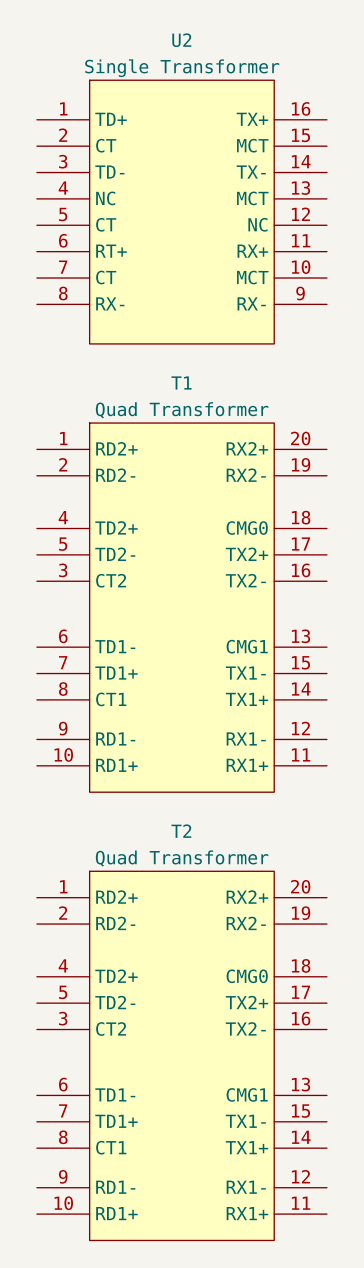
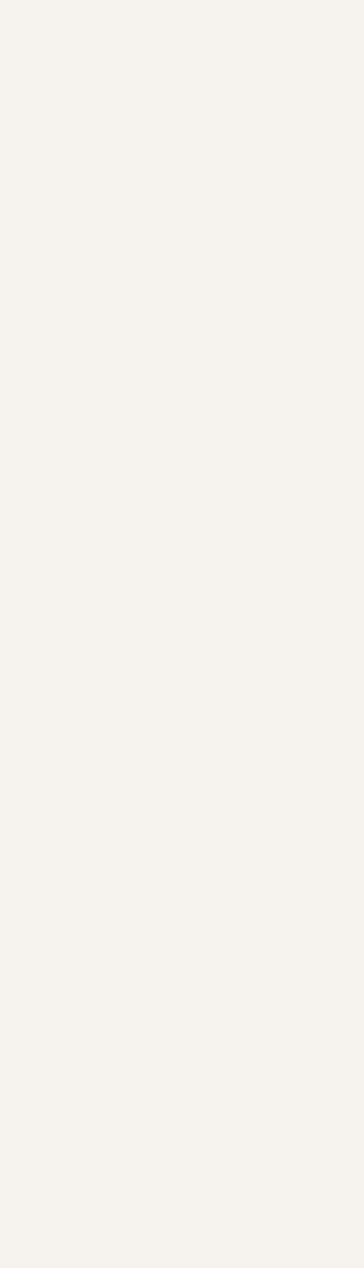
U2: Single Transformer (181, 212) -> none
T1: Quad Transformer (181, 607) -> none
T2: Quad Transformer (181, 1055) -> none

